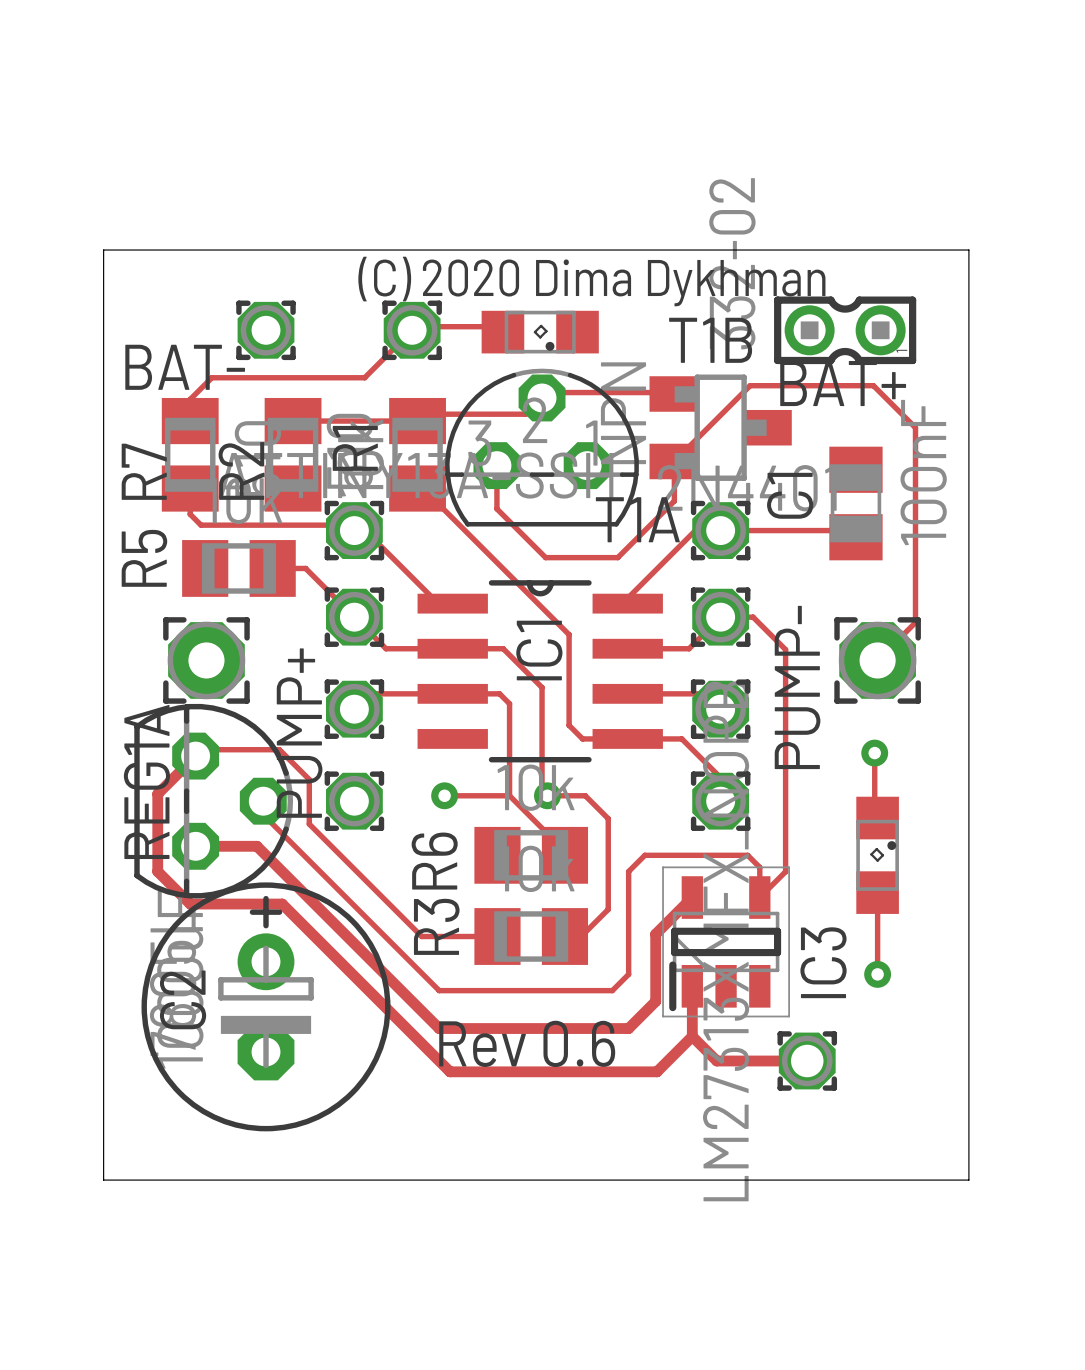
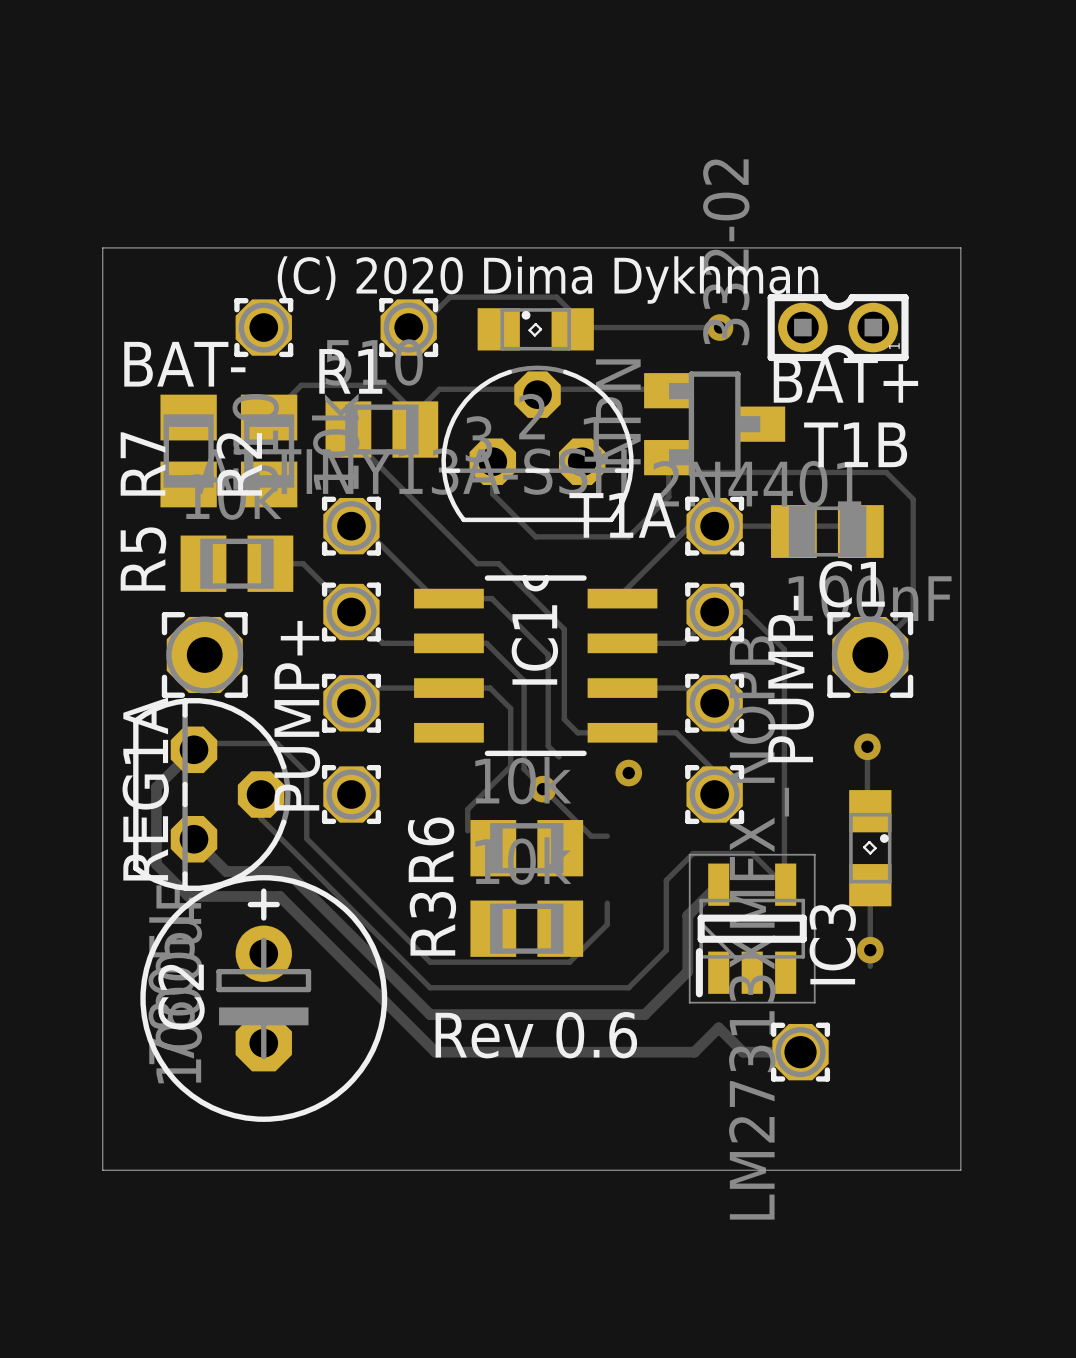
track: none -> (720, 327) (574, 327) (572, 329) (572, 313) (556, 297) (449, 297) (414, 332)
via: none -> (720, 327)
track: (502, 332) (497, 326) (415, 326) (364, 377) (211, 377) (190, 399) (190, 421) -> none
part rotation: 0° (540, 332) -> 180° (535, 329)
T1B name position: T1B (710, 340) -> T1B (855, 444)
track: (542, 397) (525, 414) (424, 414) (417, 421) (293, 421) -> (537, 394) (532, 389) (439, 389) (415, 413) (387, 385) (301, 385) (269, 417)
R2 position: (293, 454) -> (269, 451)
R1 rotation: 0° (417, 454) -> 90° clockwise (381, 429)
track: (674, 461) (750, 385) (873, 385) (915, 427) (915, 622) -> (668, 457) (683, 472) (886, 472) (913, 499) (913, 612) (907, 617)
track: (190, 488) (190, 514) (201, 525) (348, 525) (354, 530) (359, 530) -> none
track: (417, 488) (422, 488) (502, 568) -> (348, 429) (348, 434) (477, 563) (498, 563)
C1 name position: C1 (790, 495) -> C1 (852, 584)
track: (496, 498) (496, 508) (545, 557) (617, 557) (634, 541) -> (492, 493) (535, 536) (628, 536)
C1 rotation: 0° (855, 503) -> 90° clockwise (827, 531)
track: none -> (448, 598) (491, 598) (548, 654) (548, 746) (558, 756)
track: (490, 648) (503, 648) (542, 687) (542, 790) (547, 795) (585, 795) (608, 818) (608, 909) (581, 936) (564, 936) -> (486, 643) (524, 680) (524, 769) (591, 836) (607, 836)
track: (785, 649) (785, 871) (759, 897) (759, 867) (747, 855) (644, 855) (628, 871) (628, 974) (612, 990) (439, 990) (263, 814) -> (779, 644) (784, 649) (785, 884) (783, 884) (752, 853) (693, 853) (666, 880) (666, 950) (628, 987) (430, 987) (261, 818) (261, 807)
track: (494, 693) (499, 693) (509, 703) (509, 795) -> (490, 688) (510, 708) (510, 766) (467, 809) (467, 830)
via: none -> (628, 773)
track: (444, 795) (509, 795) -> none
via: (444, 795) -> none
track: (509, 795) (564, 851) (564, 855) -> none
track: (309, 824) (421, 936) (497, 936) -> (306, 817) (306, 838) (430, 962) (569, 962) (607, 924) (607, 903)
track: (195, 846) (256, 846) (289, 878) -> (194, 839) (226, 871) (287, 871)
track: (692, 897) (655, 934) (655, 1001) (628, 1028) (439, 1028) (433, 1023) -> (718, 884) (687, 915) (687, 971) (644, 1014) (430, 1014)
IC3 position: (726, 941) -> (752, 928)
IC3 name position: IC3 (823, 962) -> IC3 (832, 944)
via position: (877, 974) -> (870, 950)
track: (692, 986) (692, 1036) -> none
track: (692, 1036) (656, 1071) (450, 1071) (439, 1060) -> (743, 1052) (718, 1027) (694, 1052) (435, 1052)
track: (692, 1036) (716, 1060) (749, 1060) -> none

